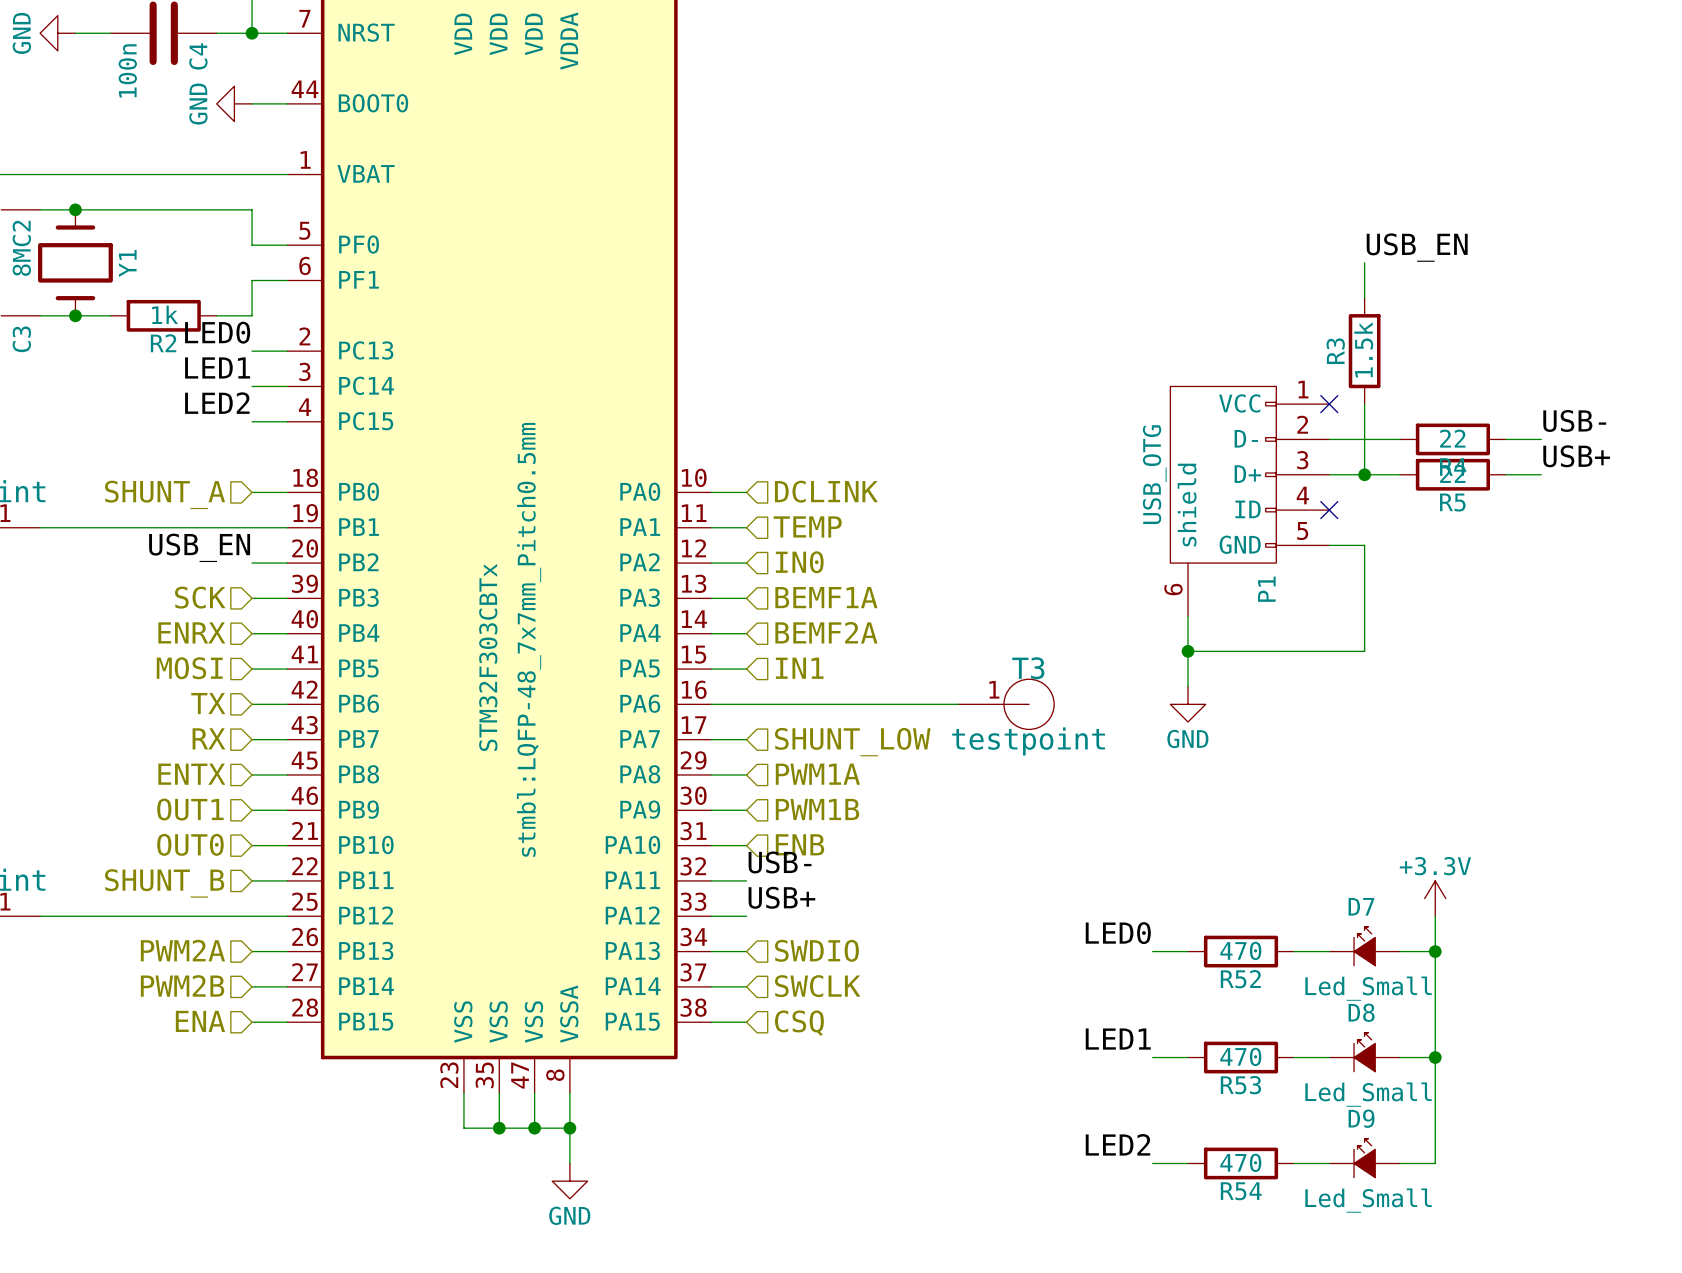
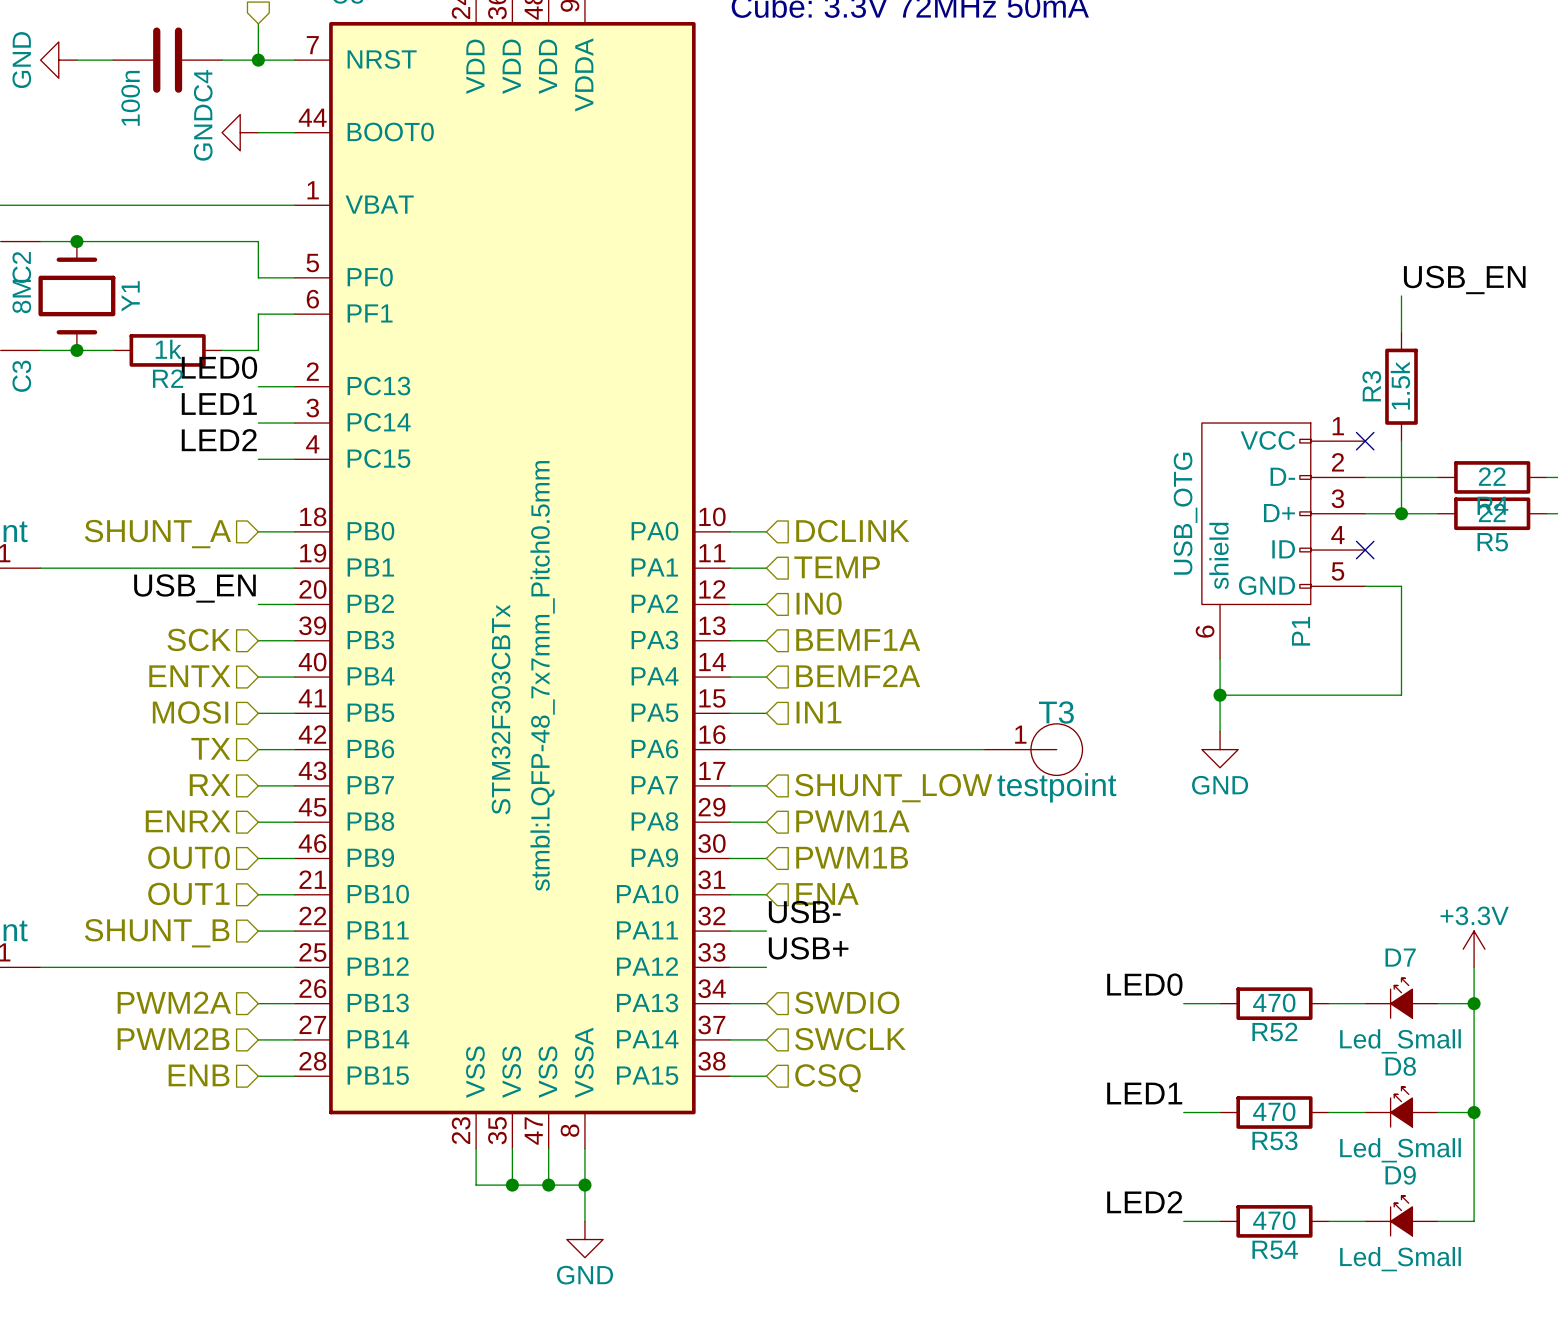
hierarchical label: ENRX (191, 632) -> ENTX (189, 676)
hierarchical label: ENTX (191, 774) -> ENRX (188, 821)
hierarchical label: OUT1 (190, 809) -> OUT0 (189, 857)
hierarchical label: OUT0 (190, 844) -> OUT1 (188, 893)
hierarchical label: ENB (799, 844) -> ENA (827, 893)
hierarchical label: ENA (200, 1021) -> ENB (199, 1075)

